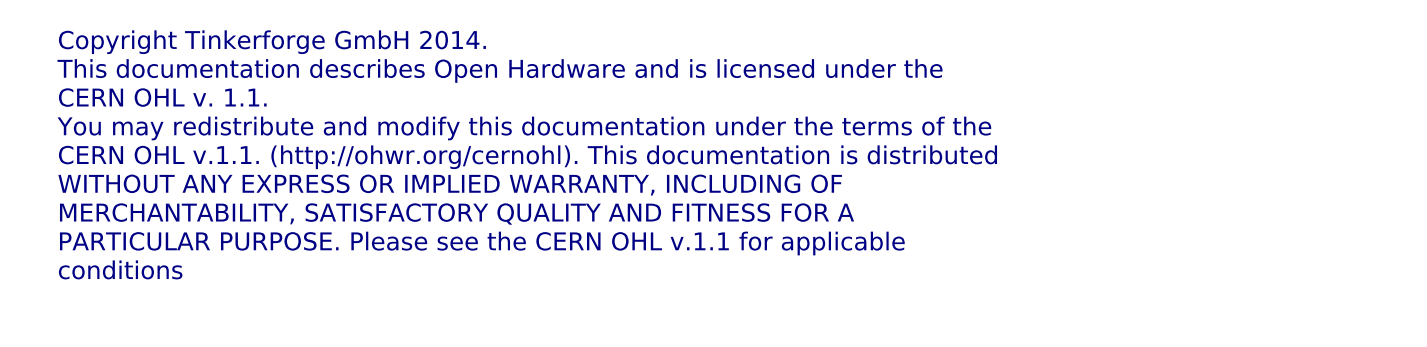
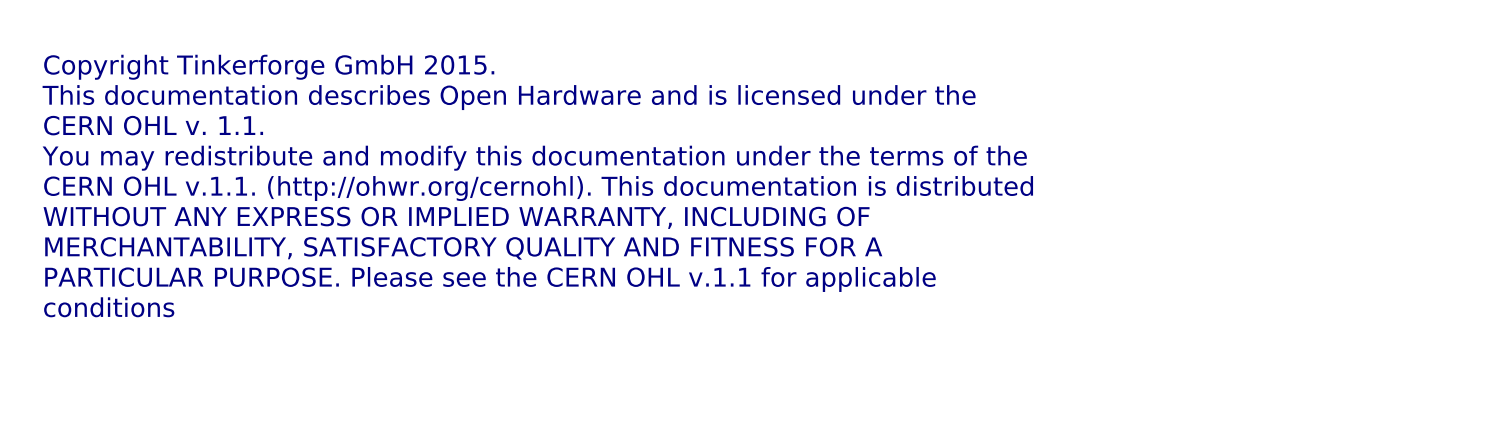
text: Copyright Tinkerforge GmbH 2014. (272, 42) -> Copyright Tinkerforge GmbH 2015. (269, 67)

